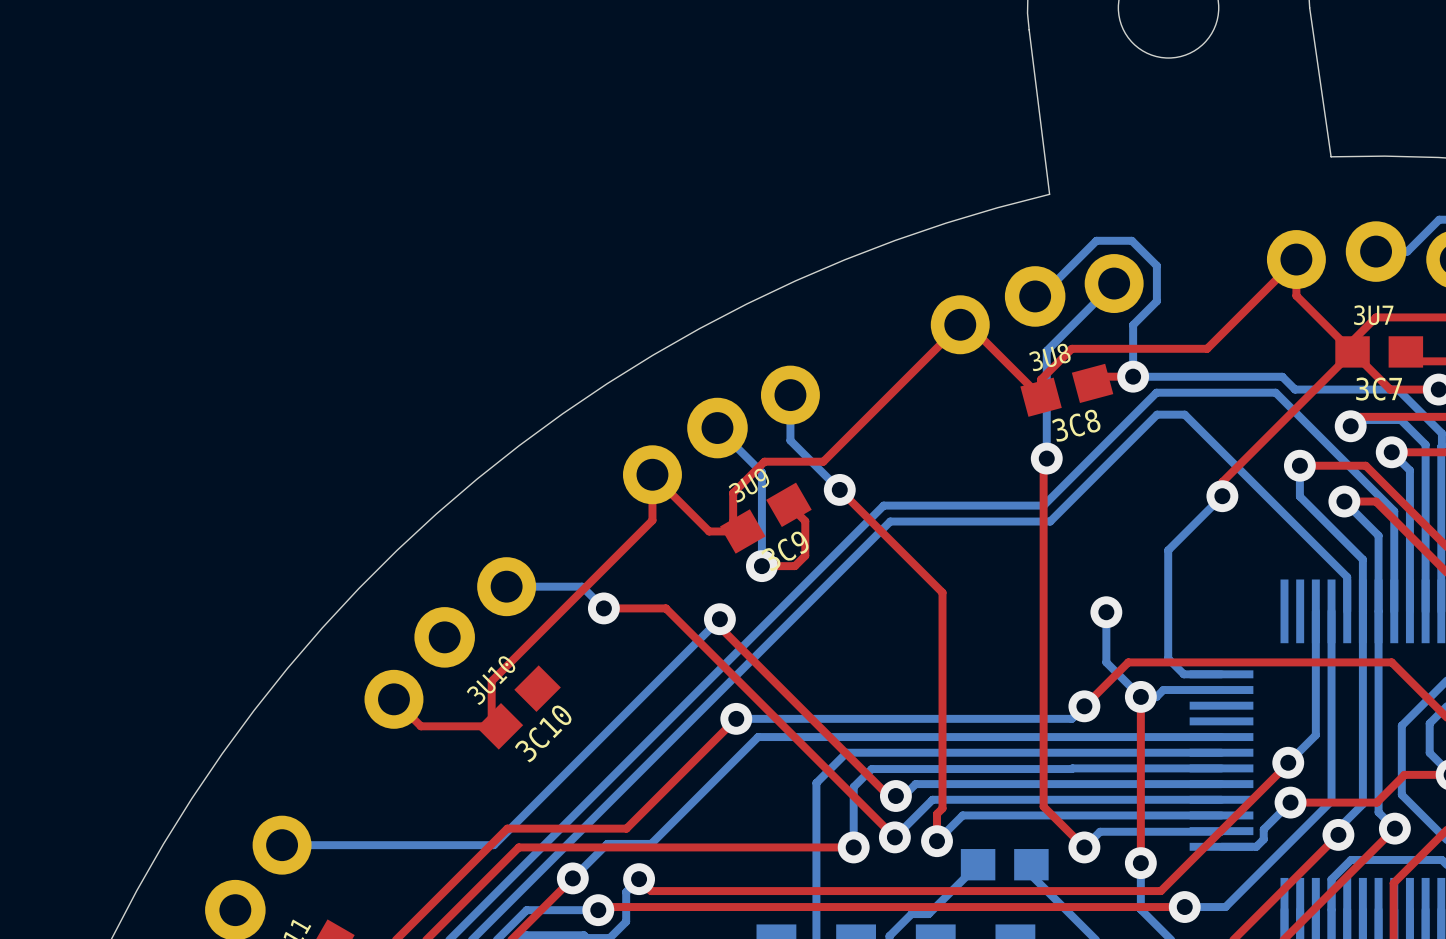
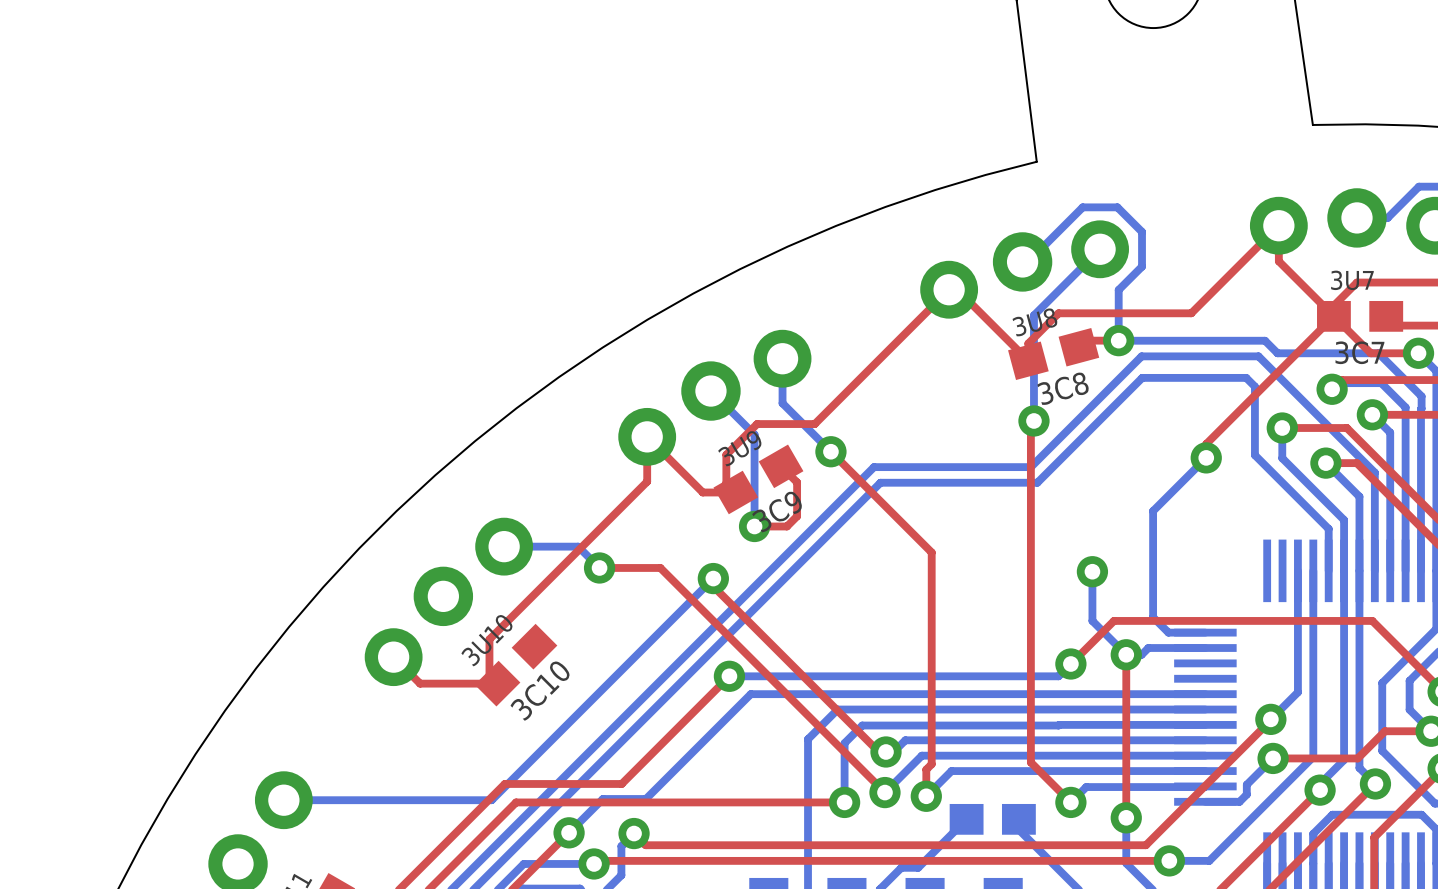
bottom track: (1184, 414) (1347, 577) -> (1169, 377) (1246, 377) (1254, 386) (1254, 455) (1328, 528) (1328, 537)

